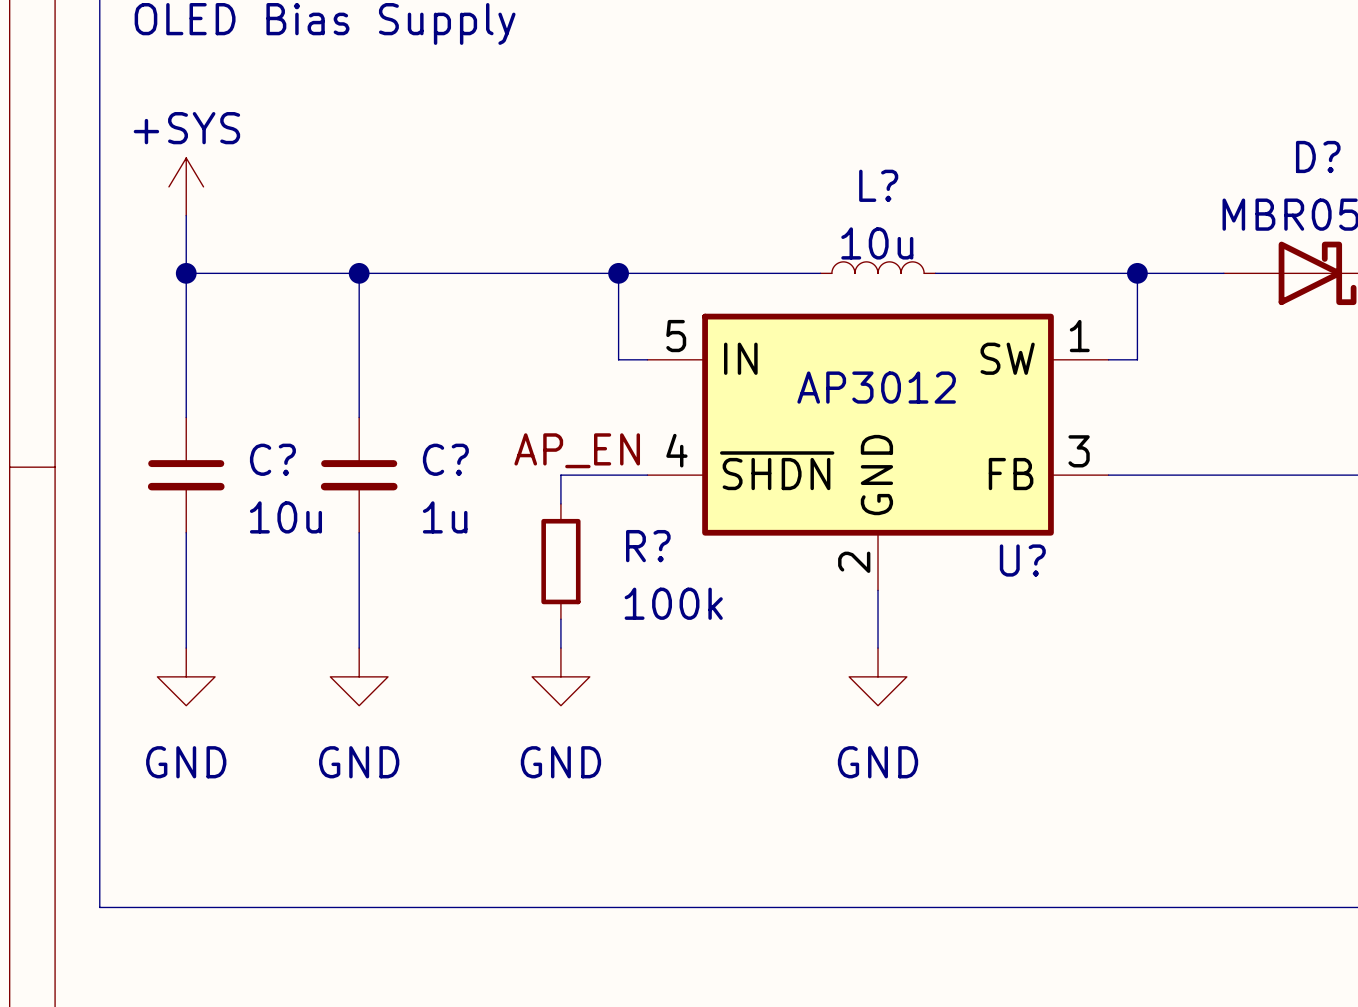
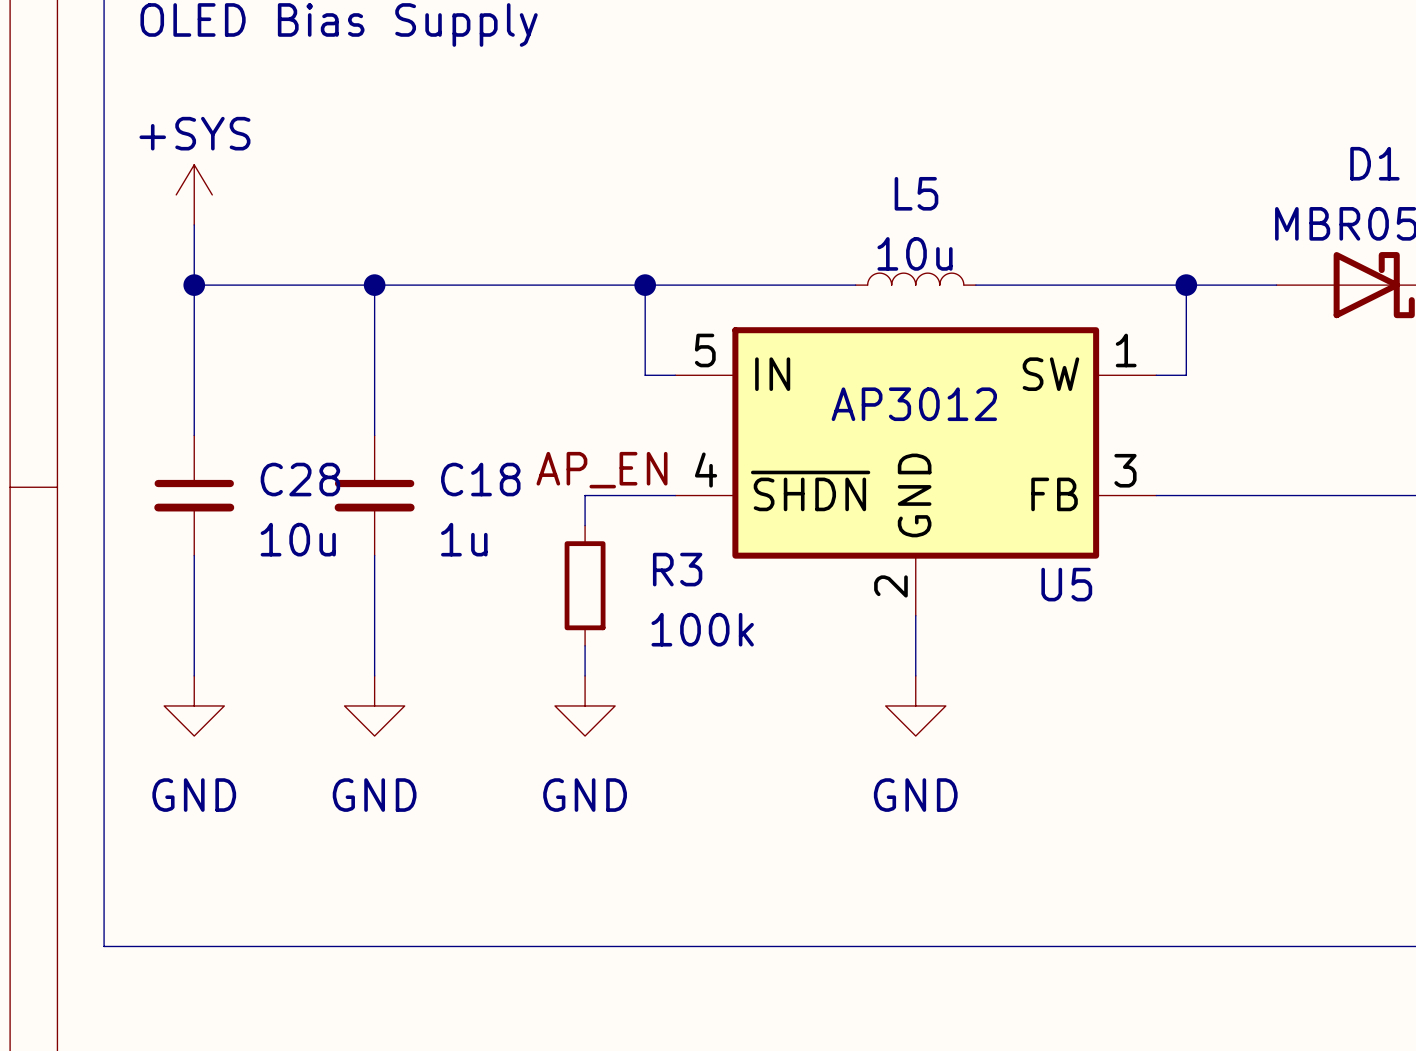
D? name: D? (1318, 156) -> D1 (1374, 163)
L? name: L? (878, 185) -> L5 (916, 193)
C? name: C? (272, 459) -> C28 (300, 479)
C? name: C? (445, 459) -> C18 (480, 479)
R? name: R? (648, 546) -> R3 (677, 569)
U? name: U? (1022, 560) -> U5 (1066, 584)

